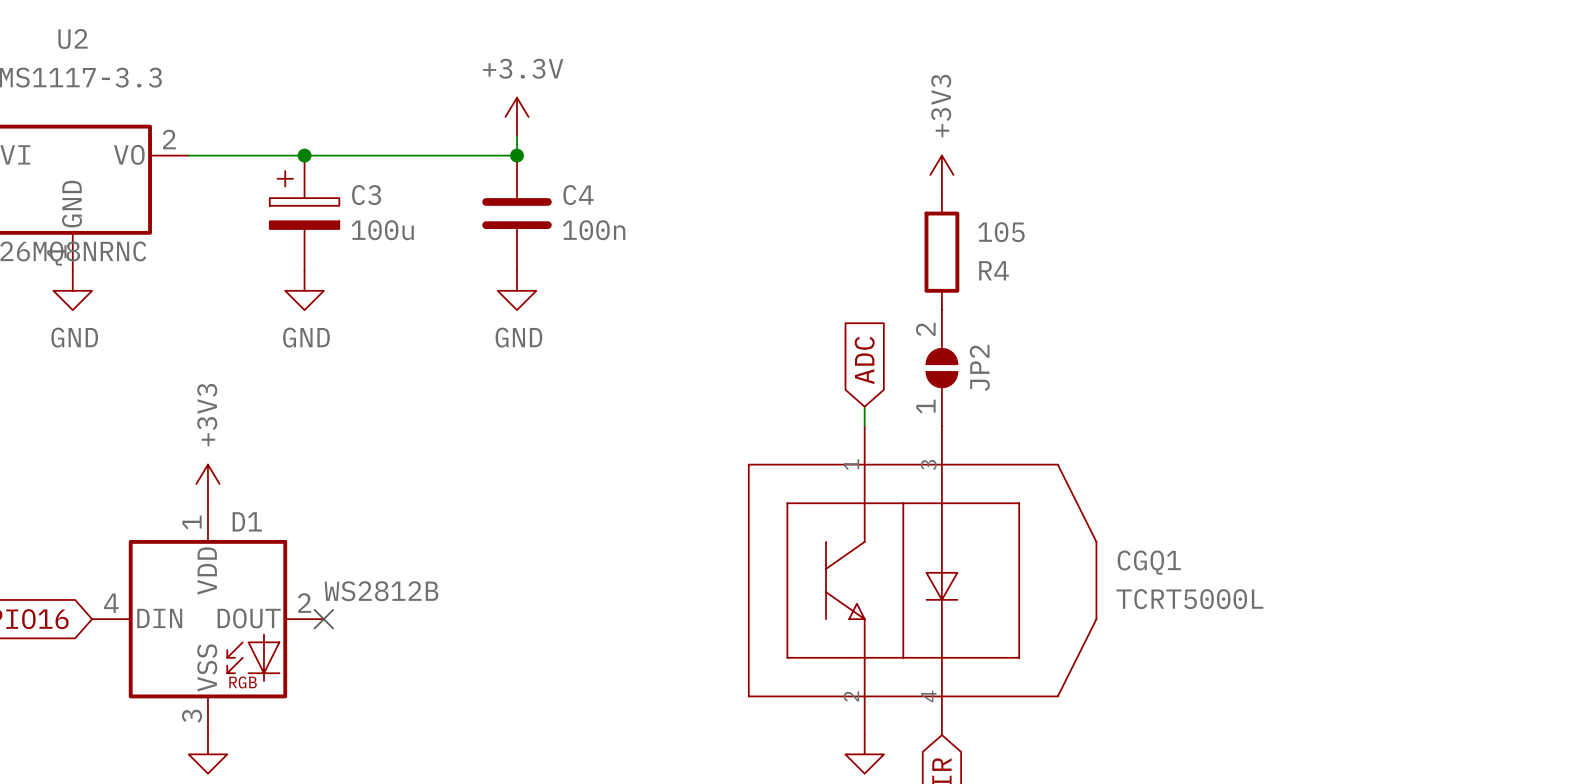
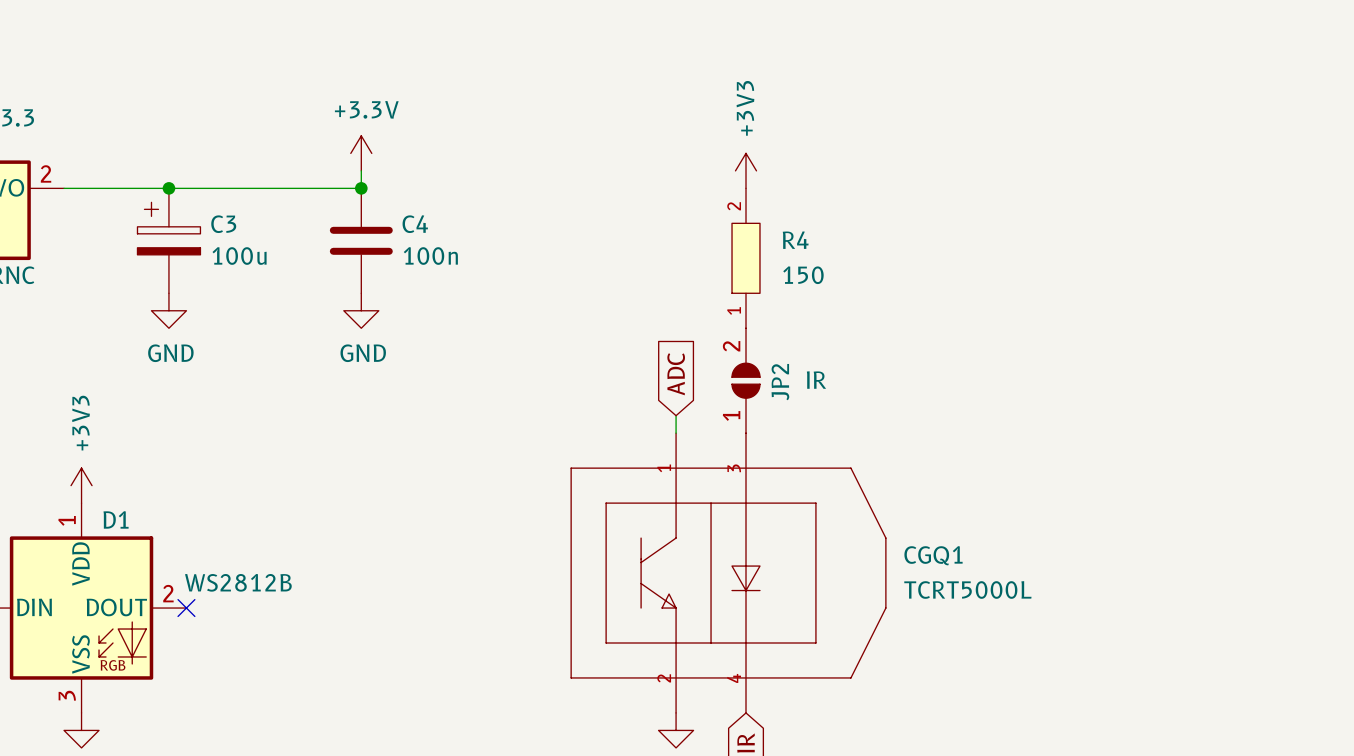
power symbol position: +3V3 (941, 174) -> +3V3 (746, 170)
R4 symbol: [924, 194, 960, 311] -> [732, 188, 760, 329]
R4 value: 105 (1001, 232) -> 150 (803, 275)
R4 name position: R4 (994, 270) -> R4 (795, 240)
JP2 value: none -> IR (816, 380)

